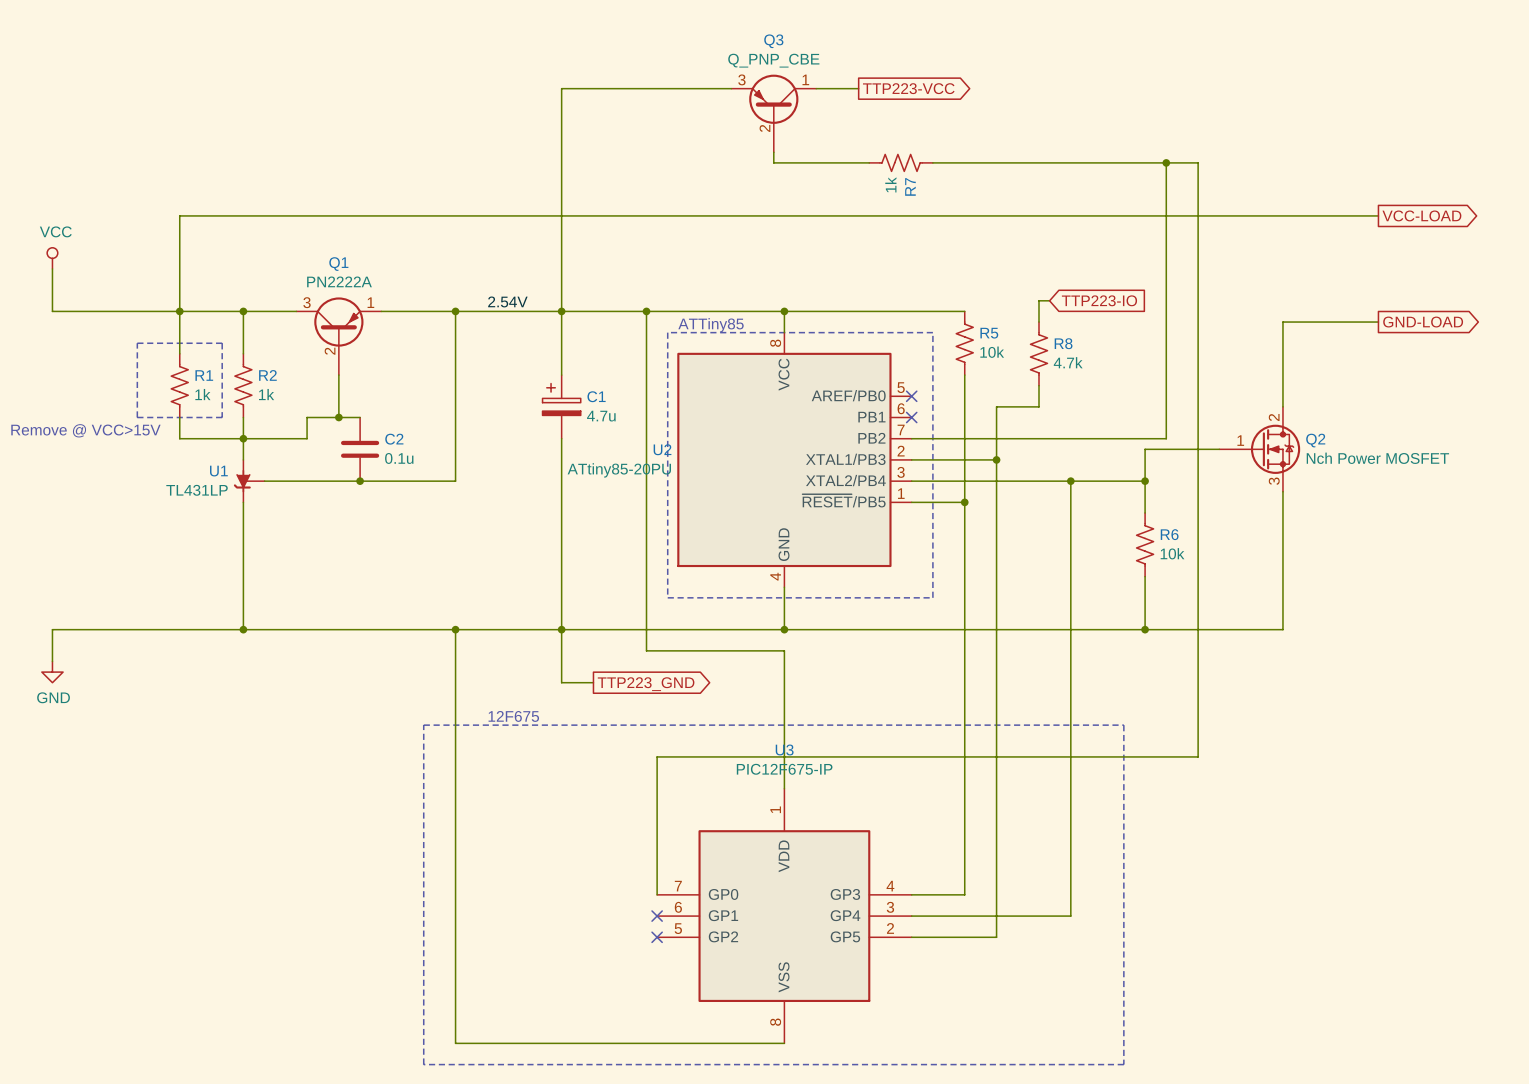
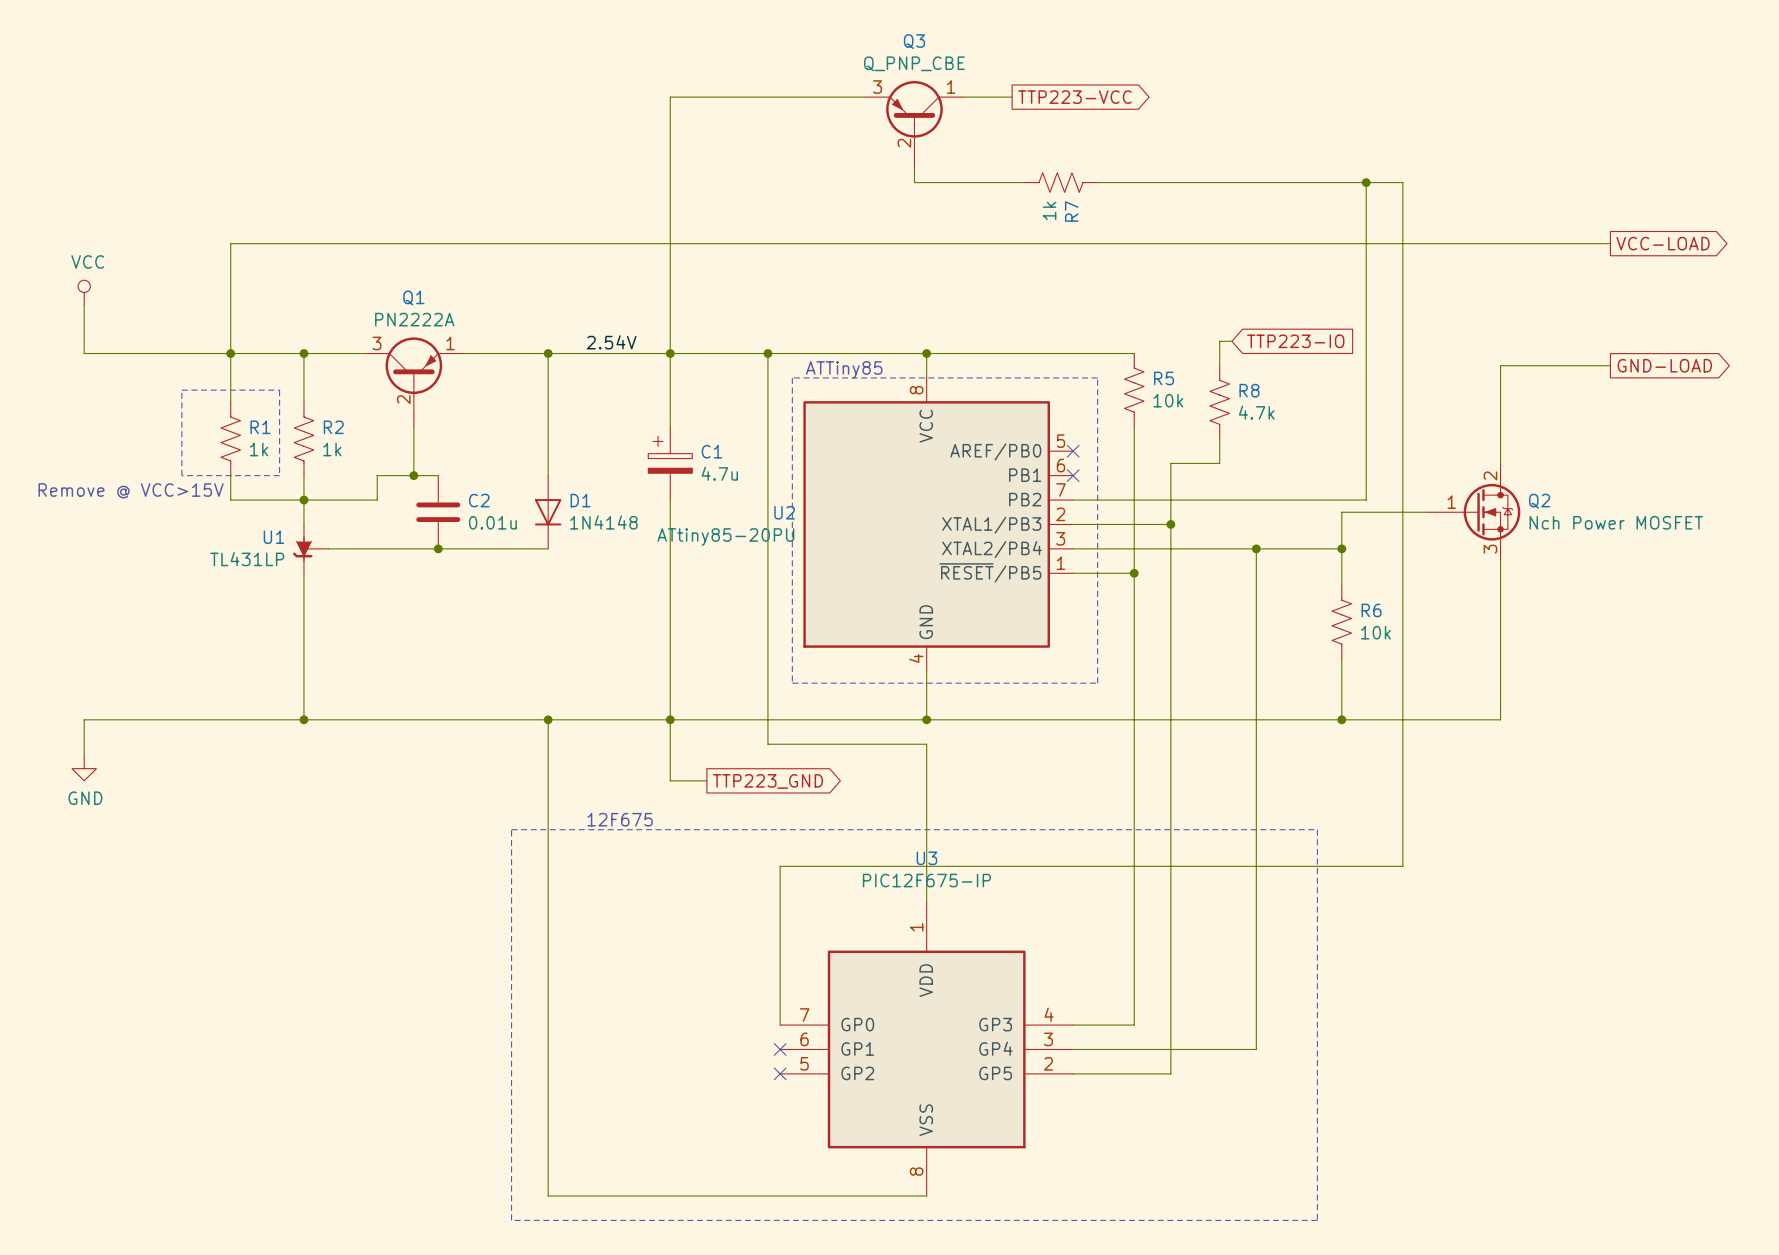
D1: none -> 1N4148 (548, 512)
C2 value: 0.1u (399, 458) -> 0.01u (492, 522)

